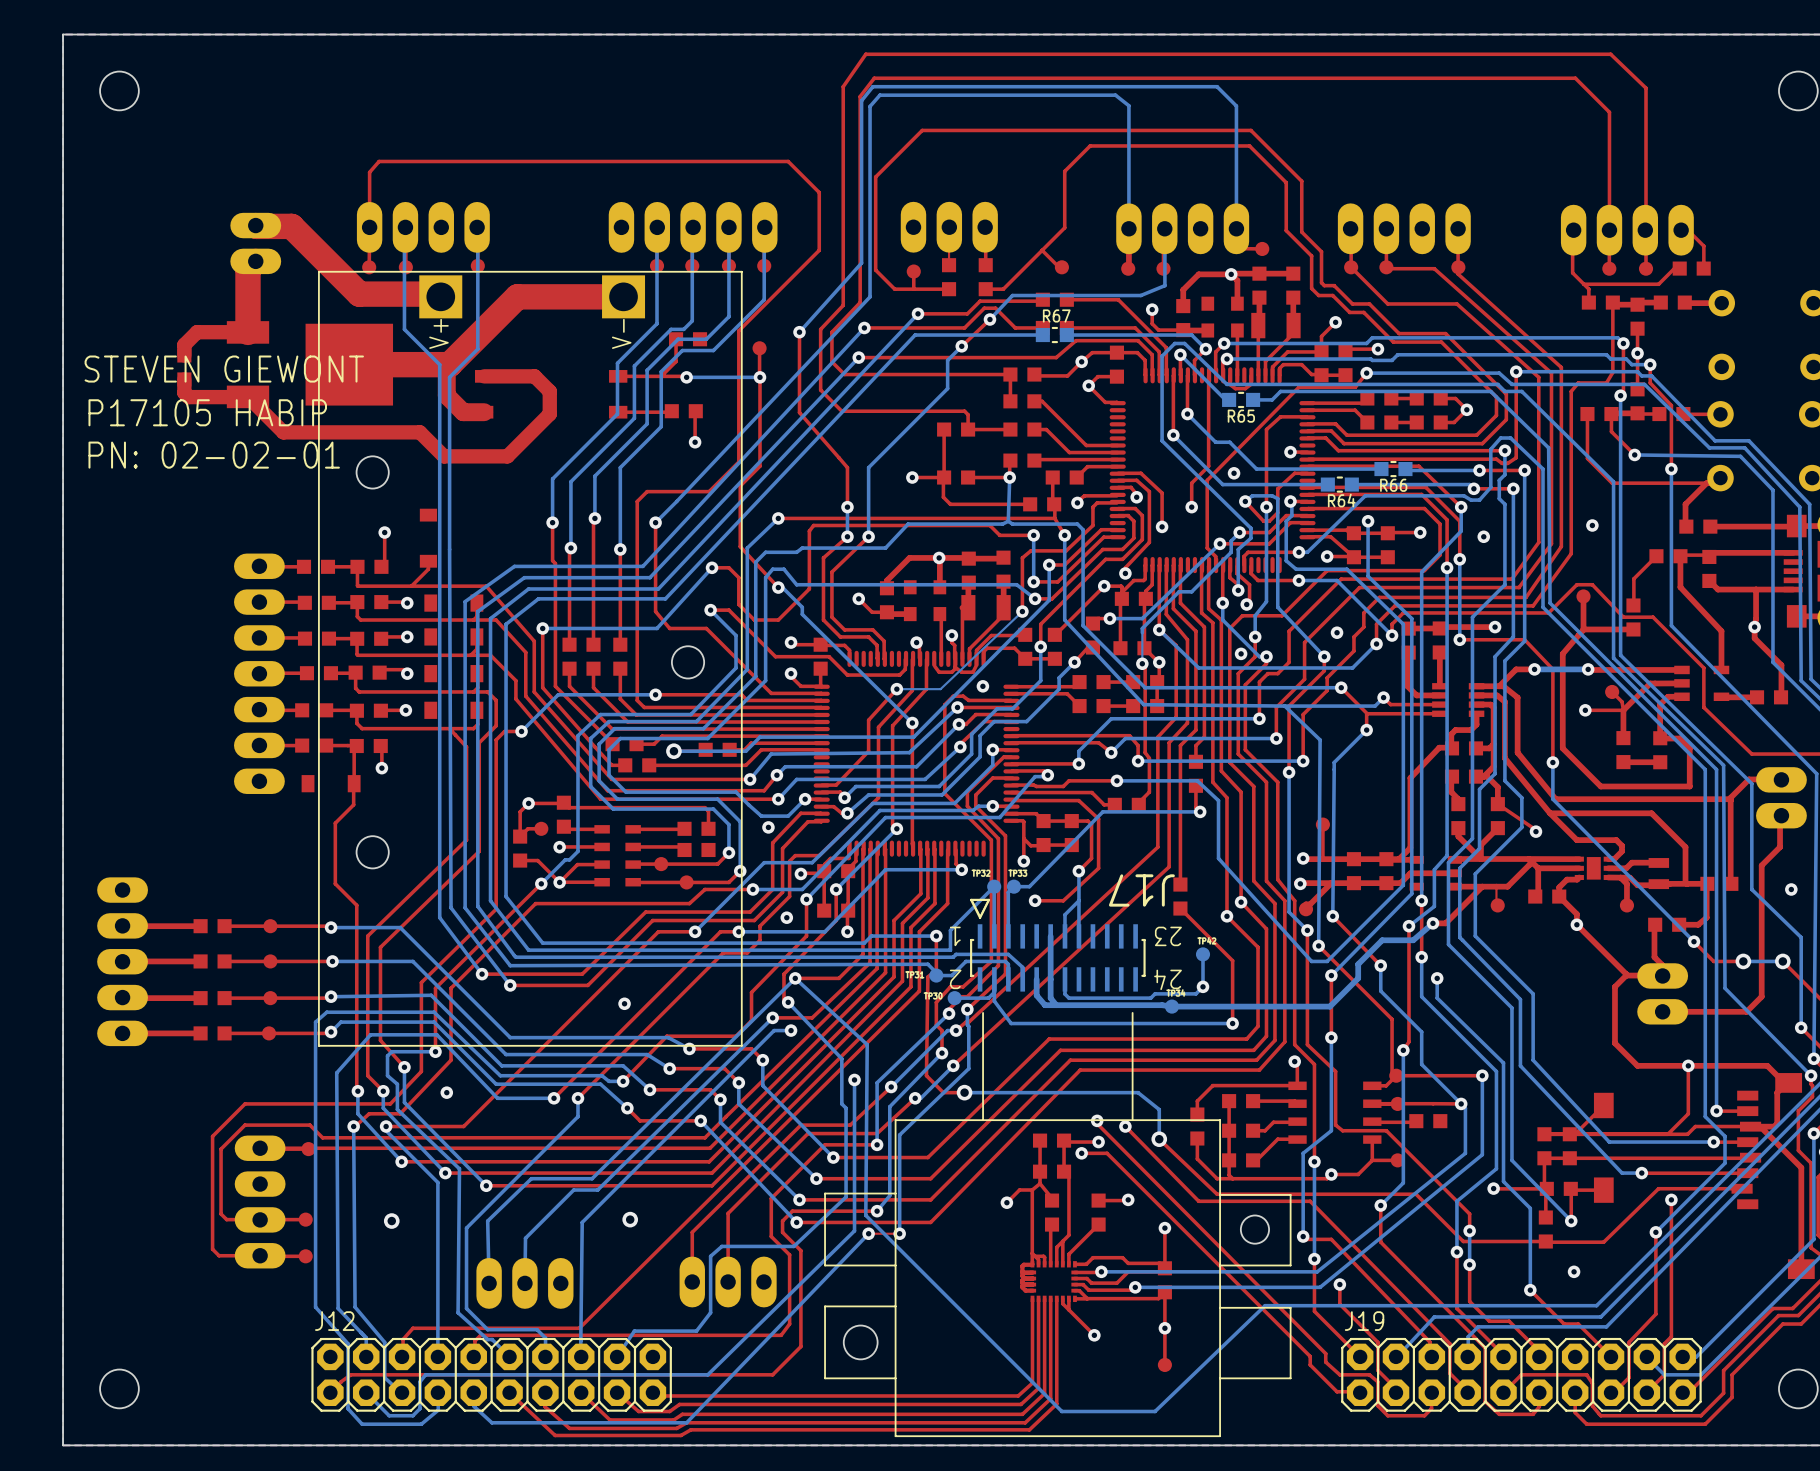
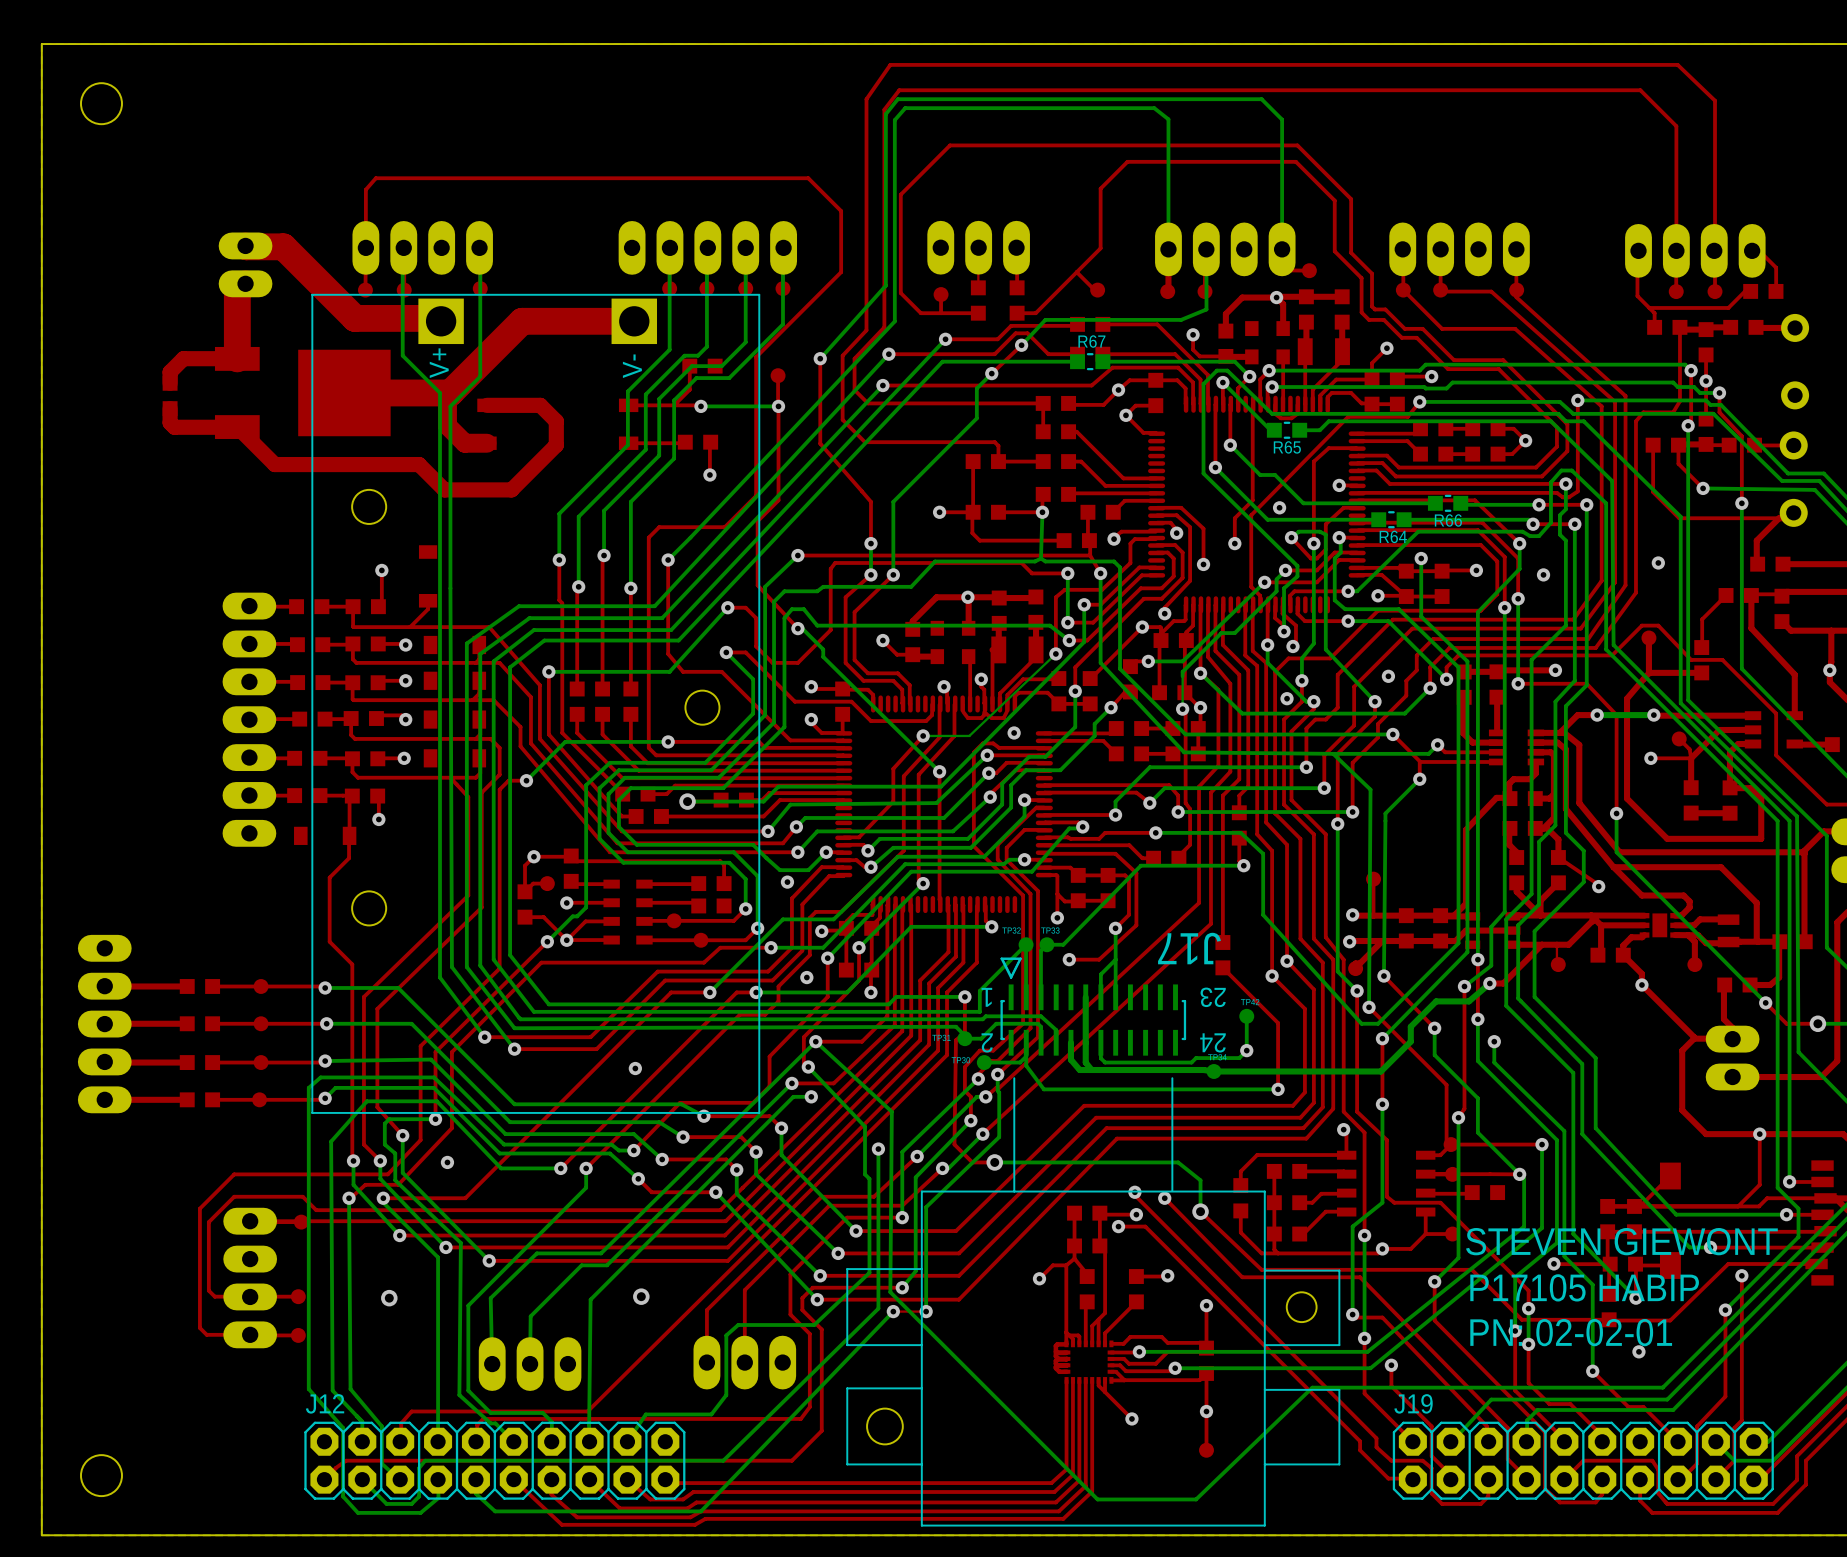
text: STEVEN GIEWONT (224, 369) -> none
text: P17105 HABIP (207, 412) -> none
text: PN: 02-02-01 (214, 455) -> none
text: none -> STEVEN GIEWONT (1621, 1241)
text: none -> P17105 HABIP (1584, 1287)
text: none -> PN: 02-02-01 (1571, 1332)

